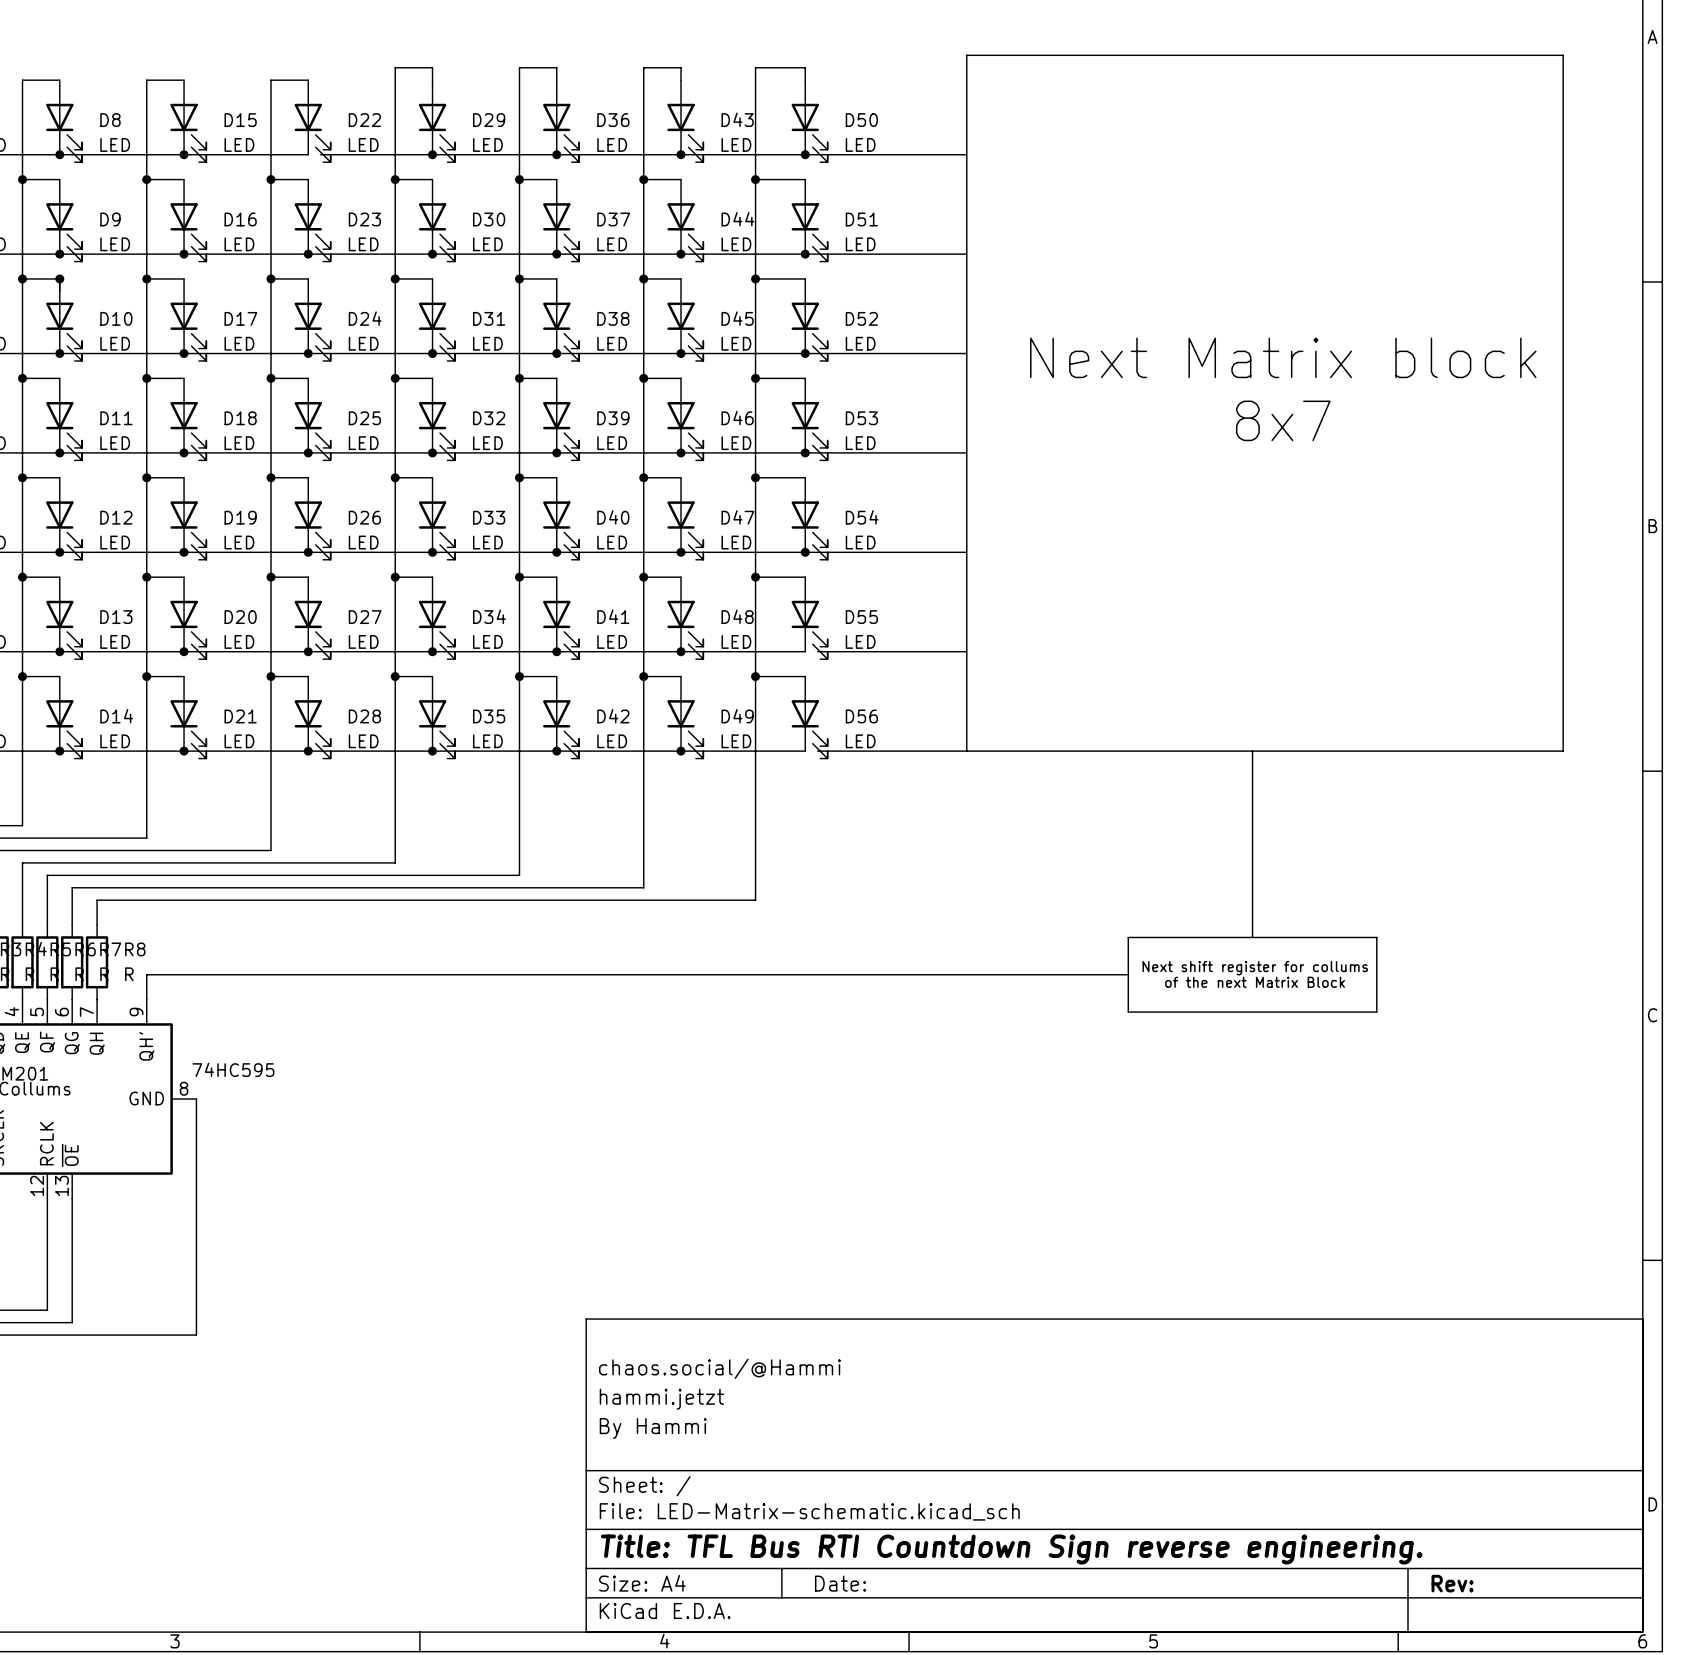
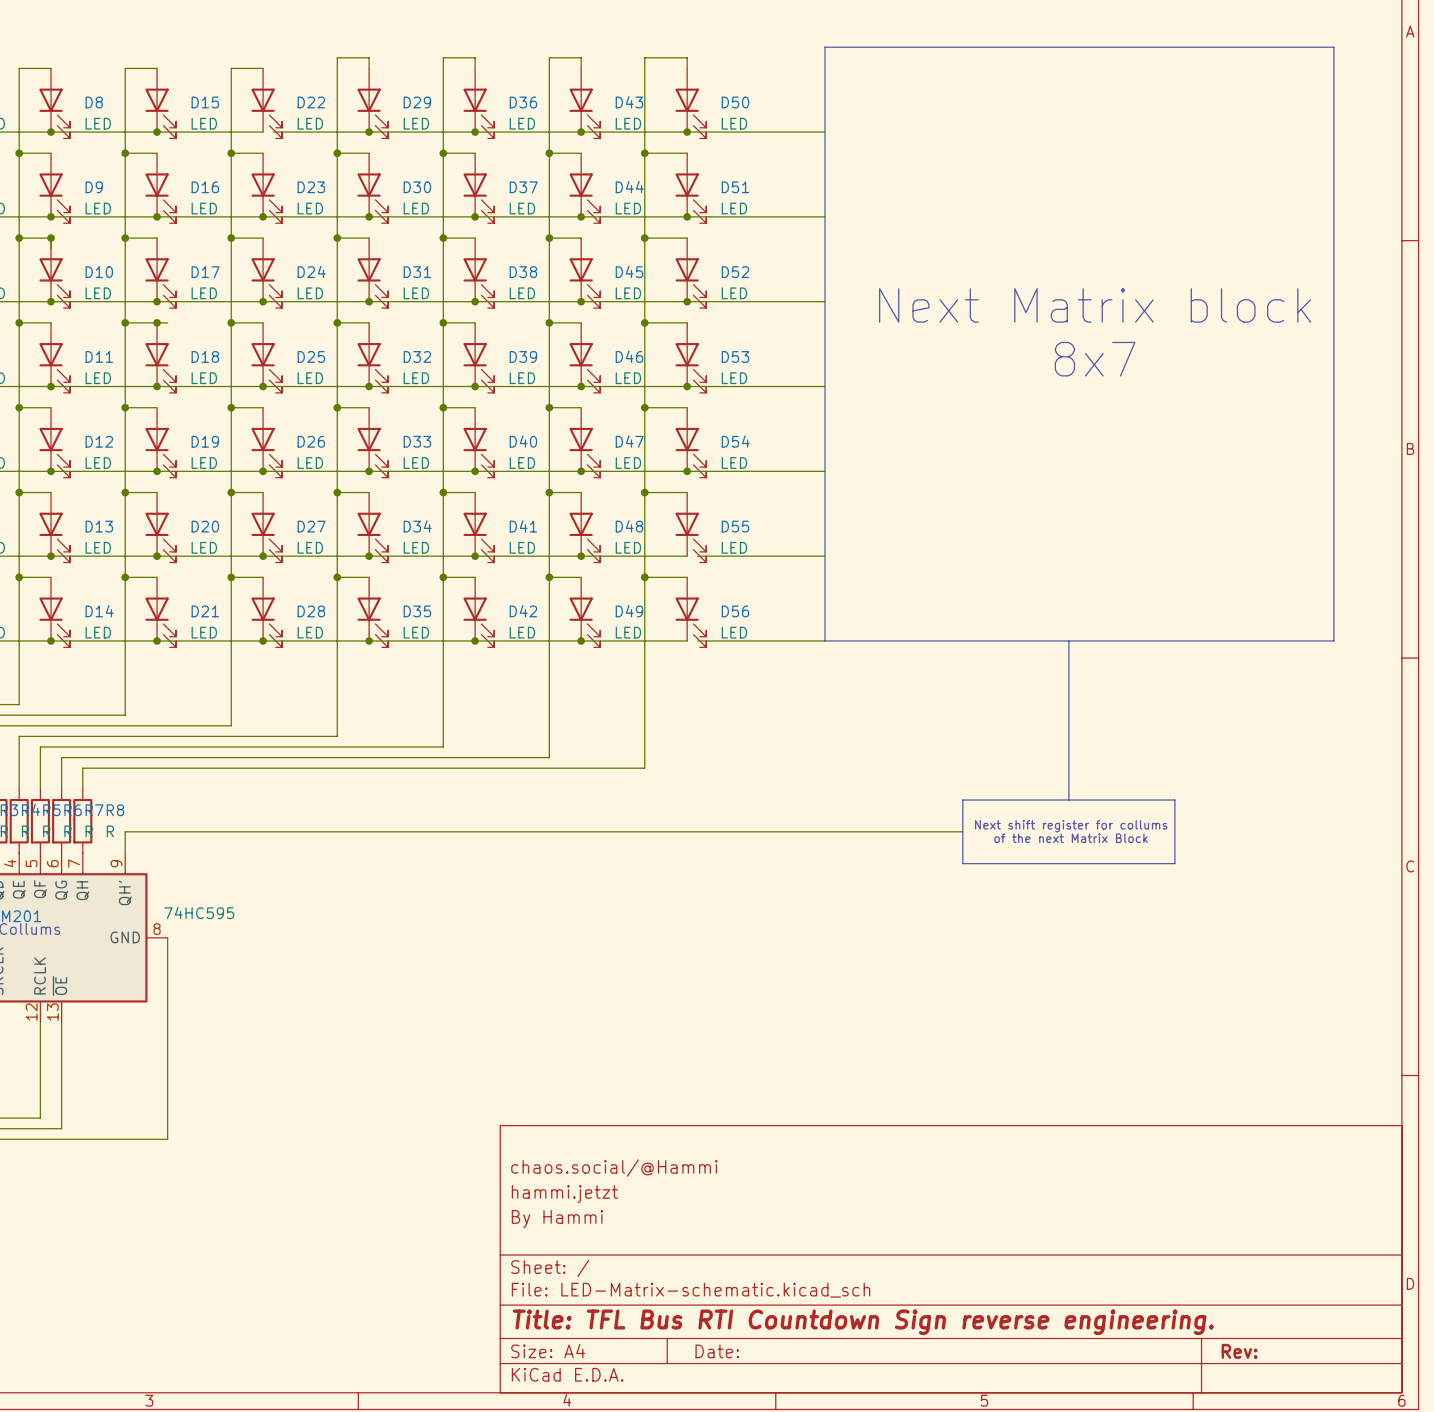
wire: none -> (157, 322) (167, 322)
junction: none -> (157, 322)

